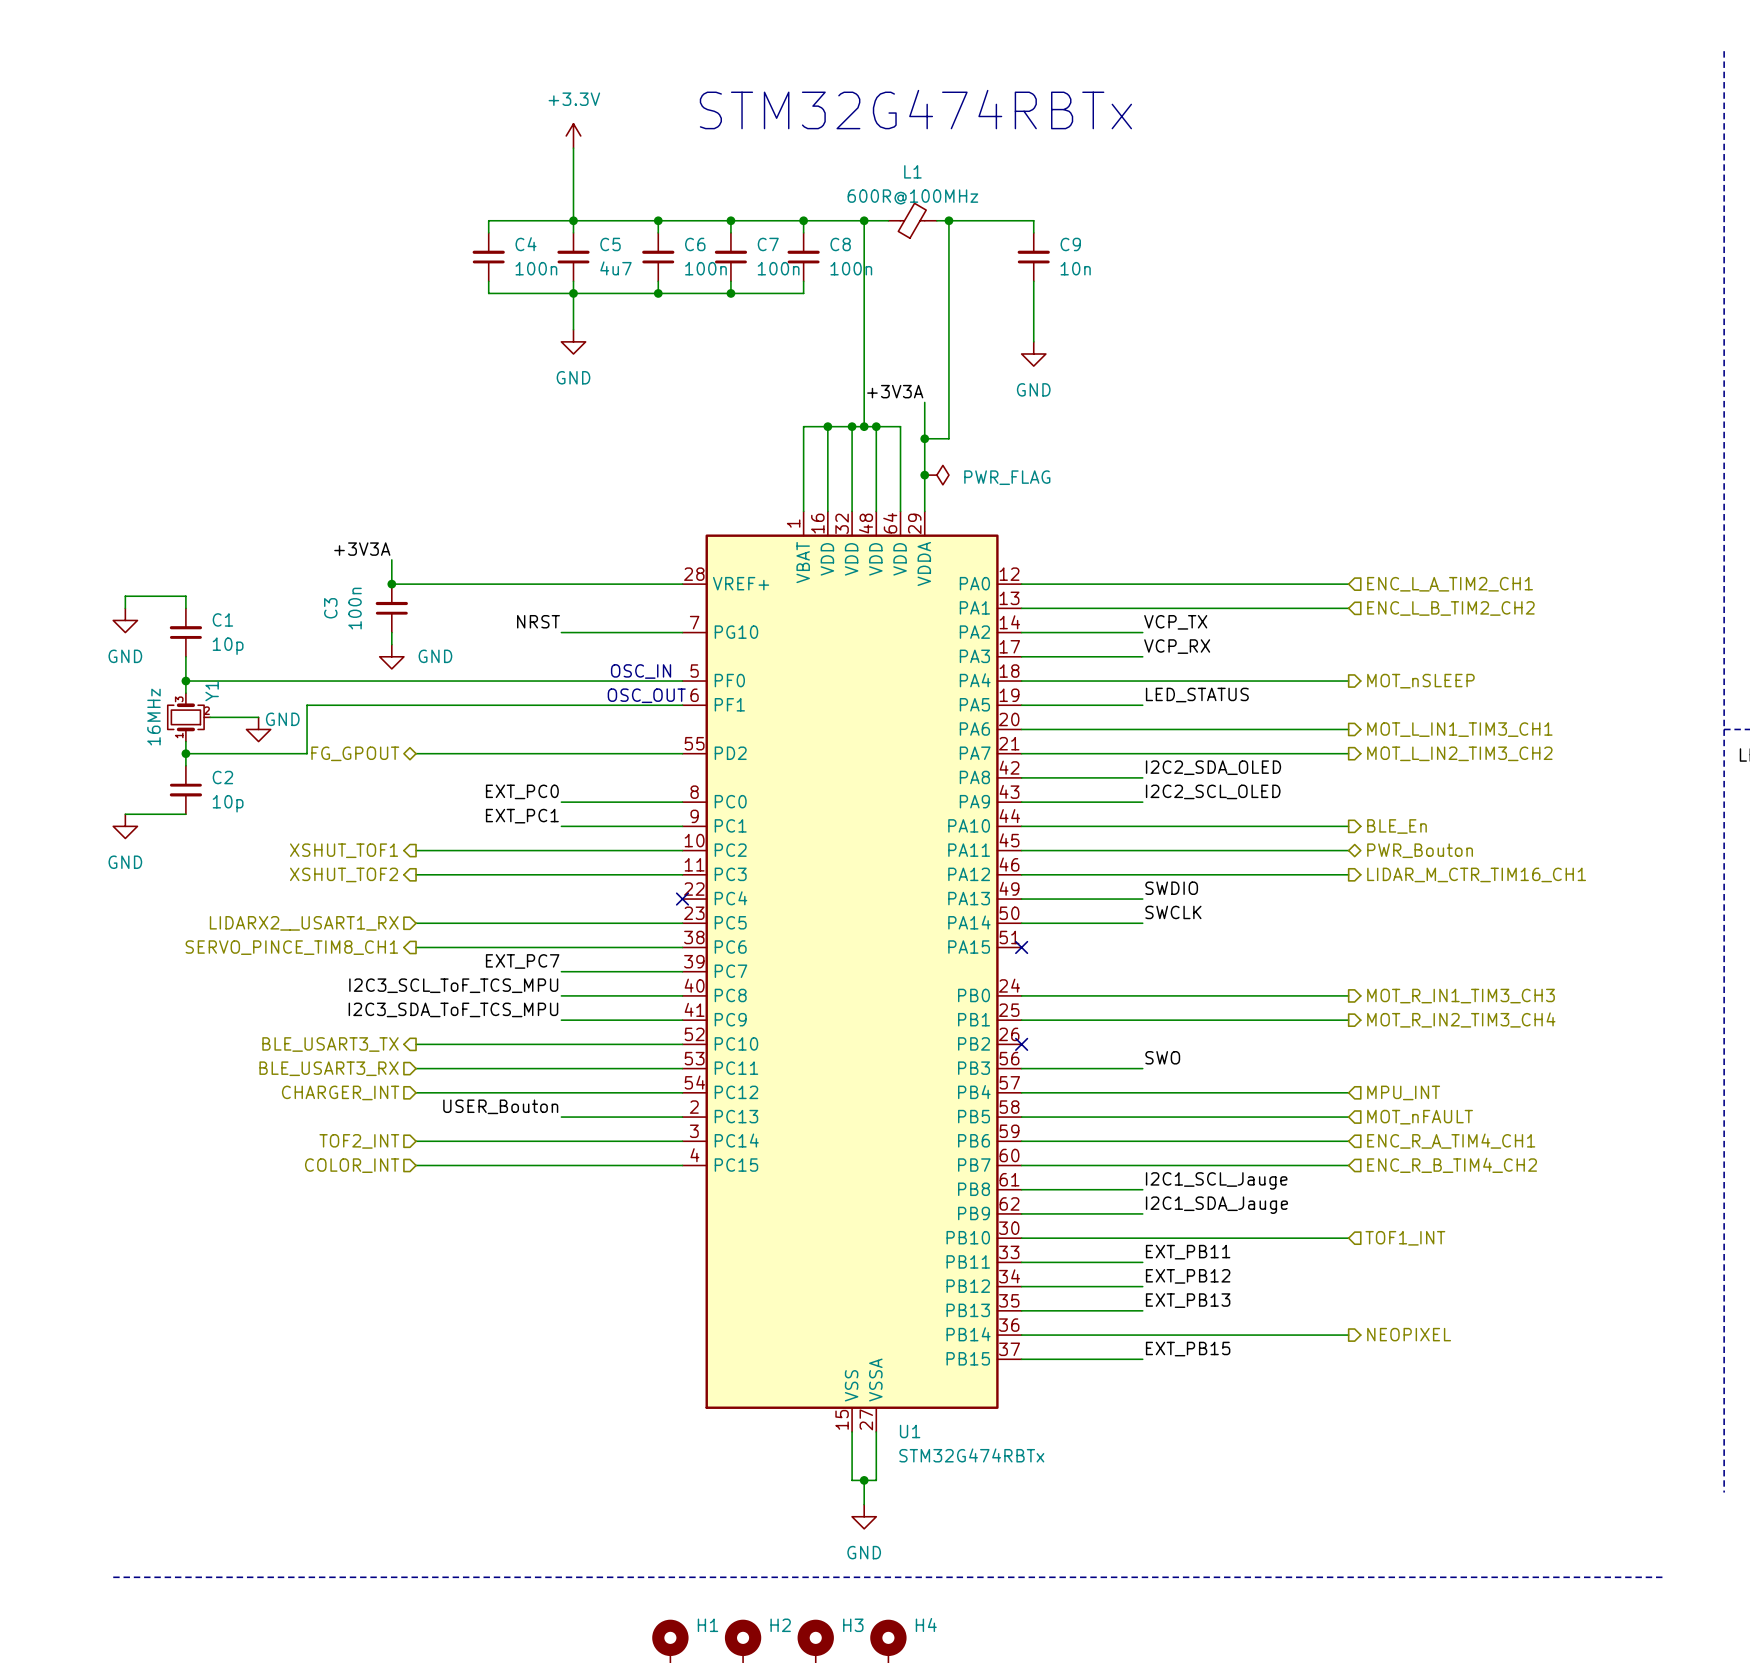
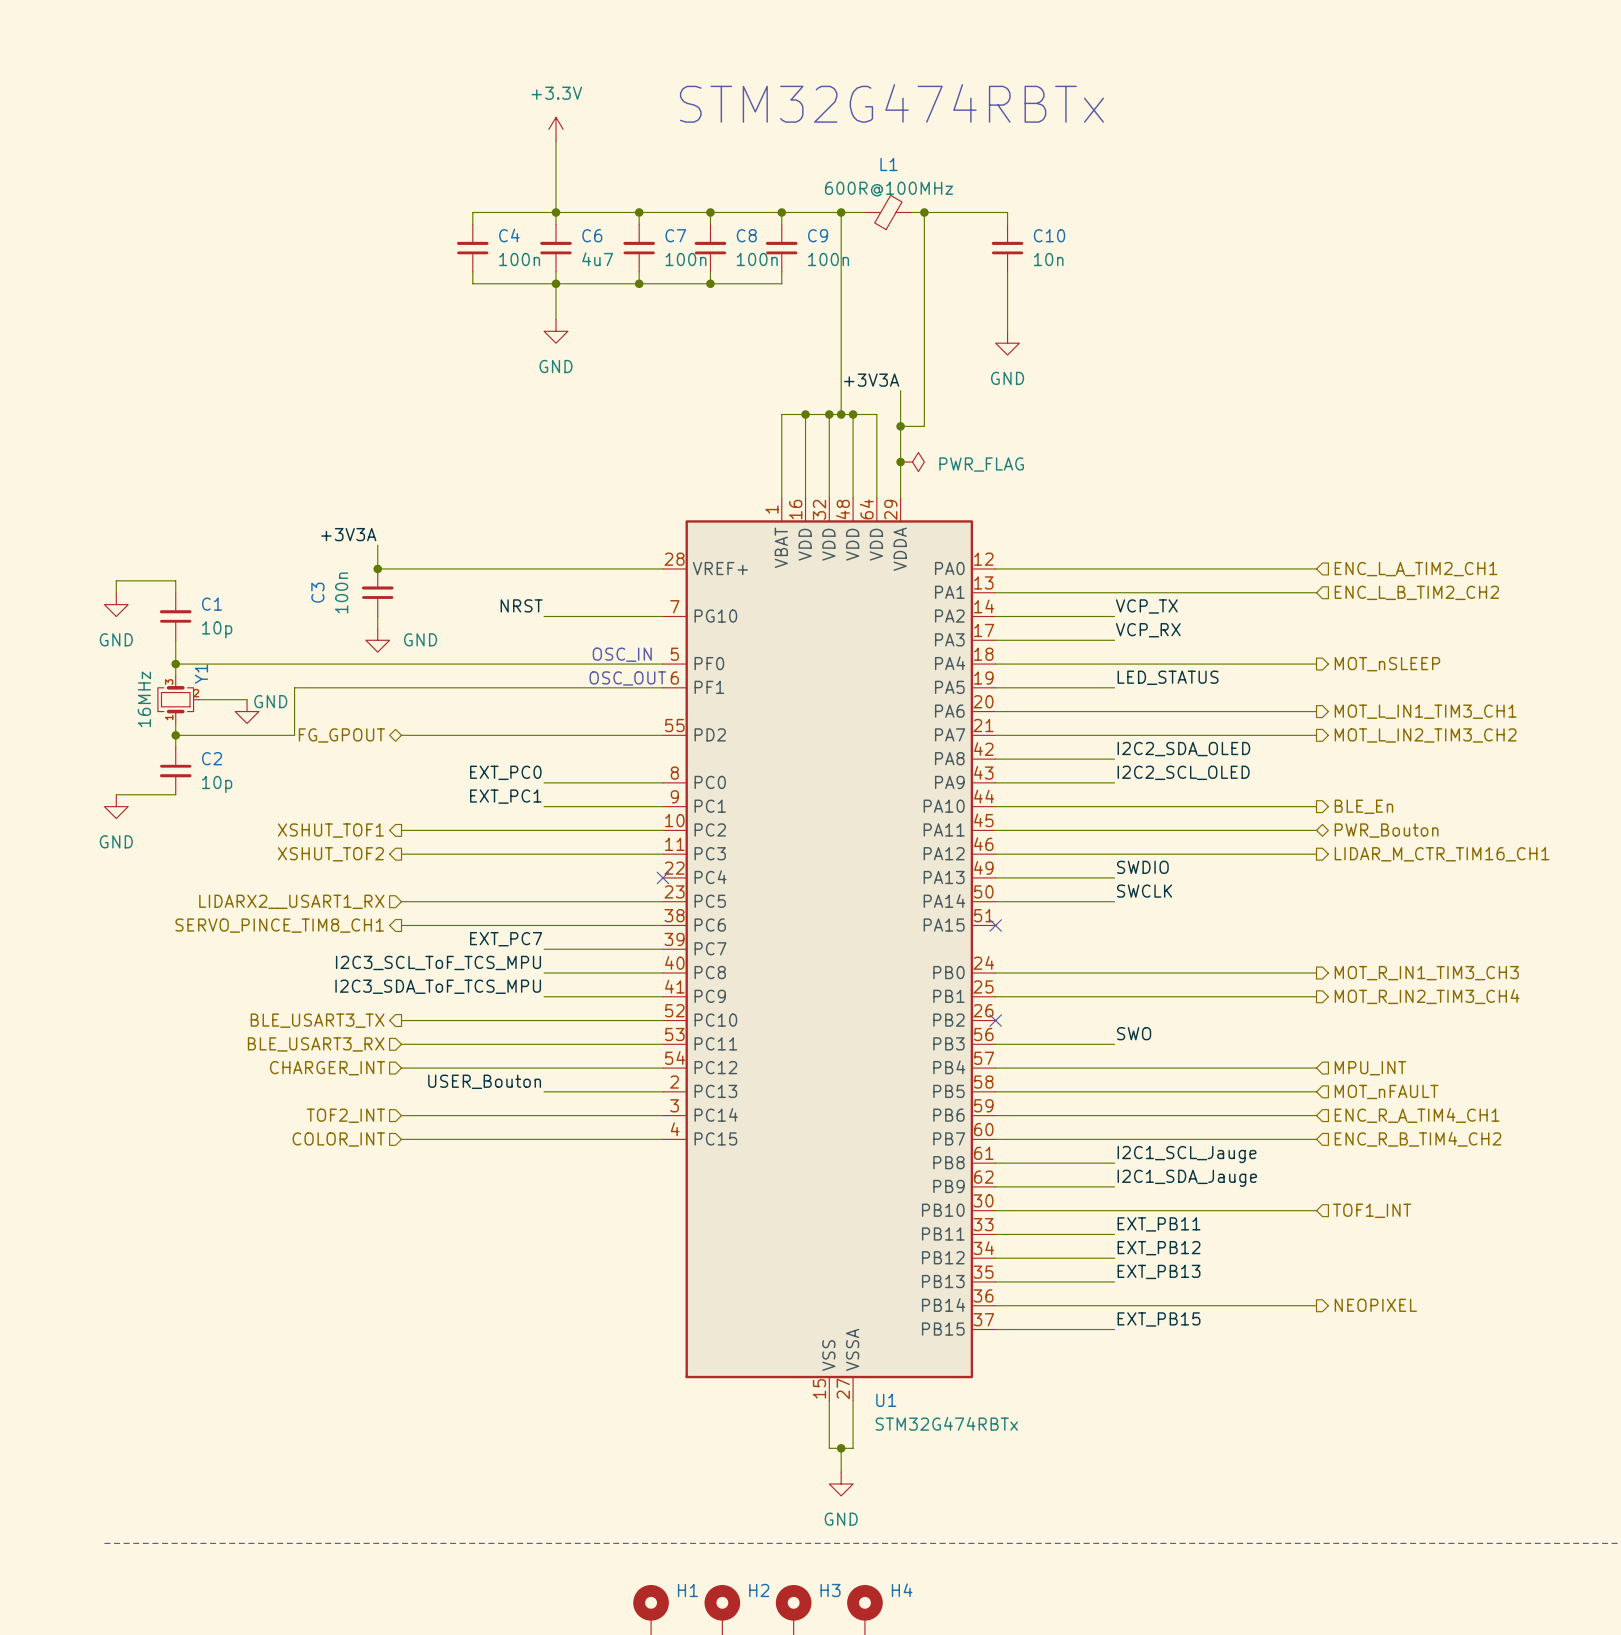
C5 name: C5 (610, 244) -> C6 (592, 235)
C6 name: C6 (695, 244) -> C7 (675, 235)
C7 name: C7 (768, 244) -> C8 (746, 235)
C8 name: C8 (840, 244) -> C9 (818, 235)
C9 name: C9 (1070, 244) -> C10 (1049, 235)

